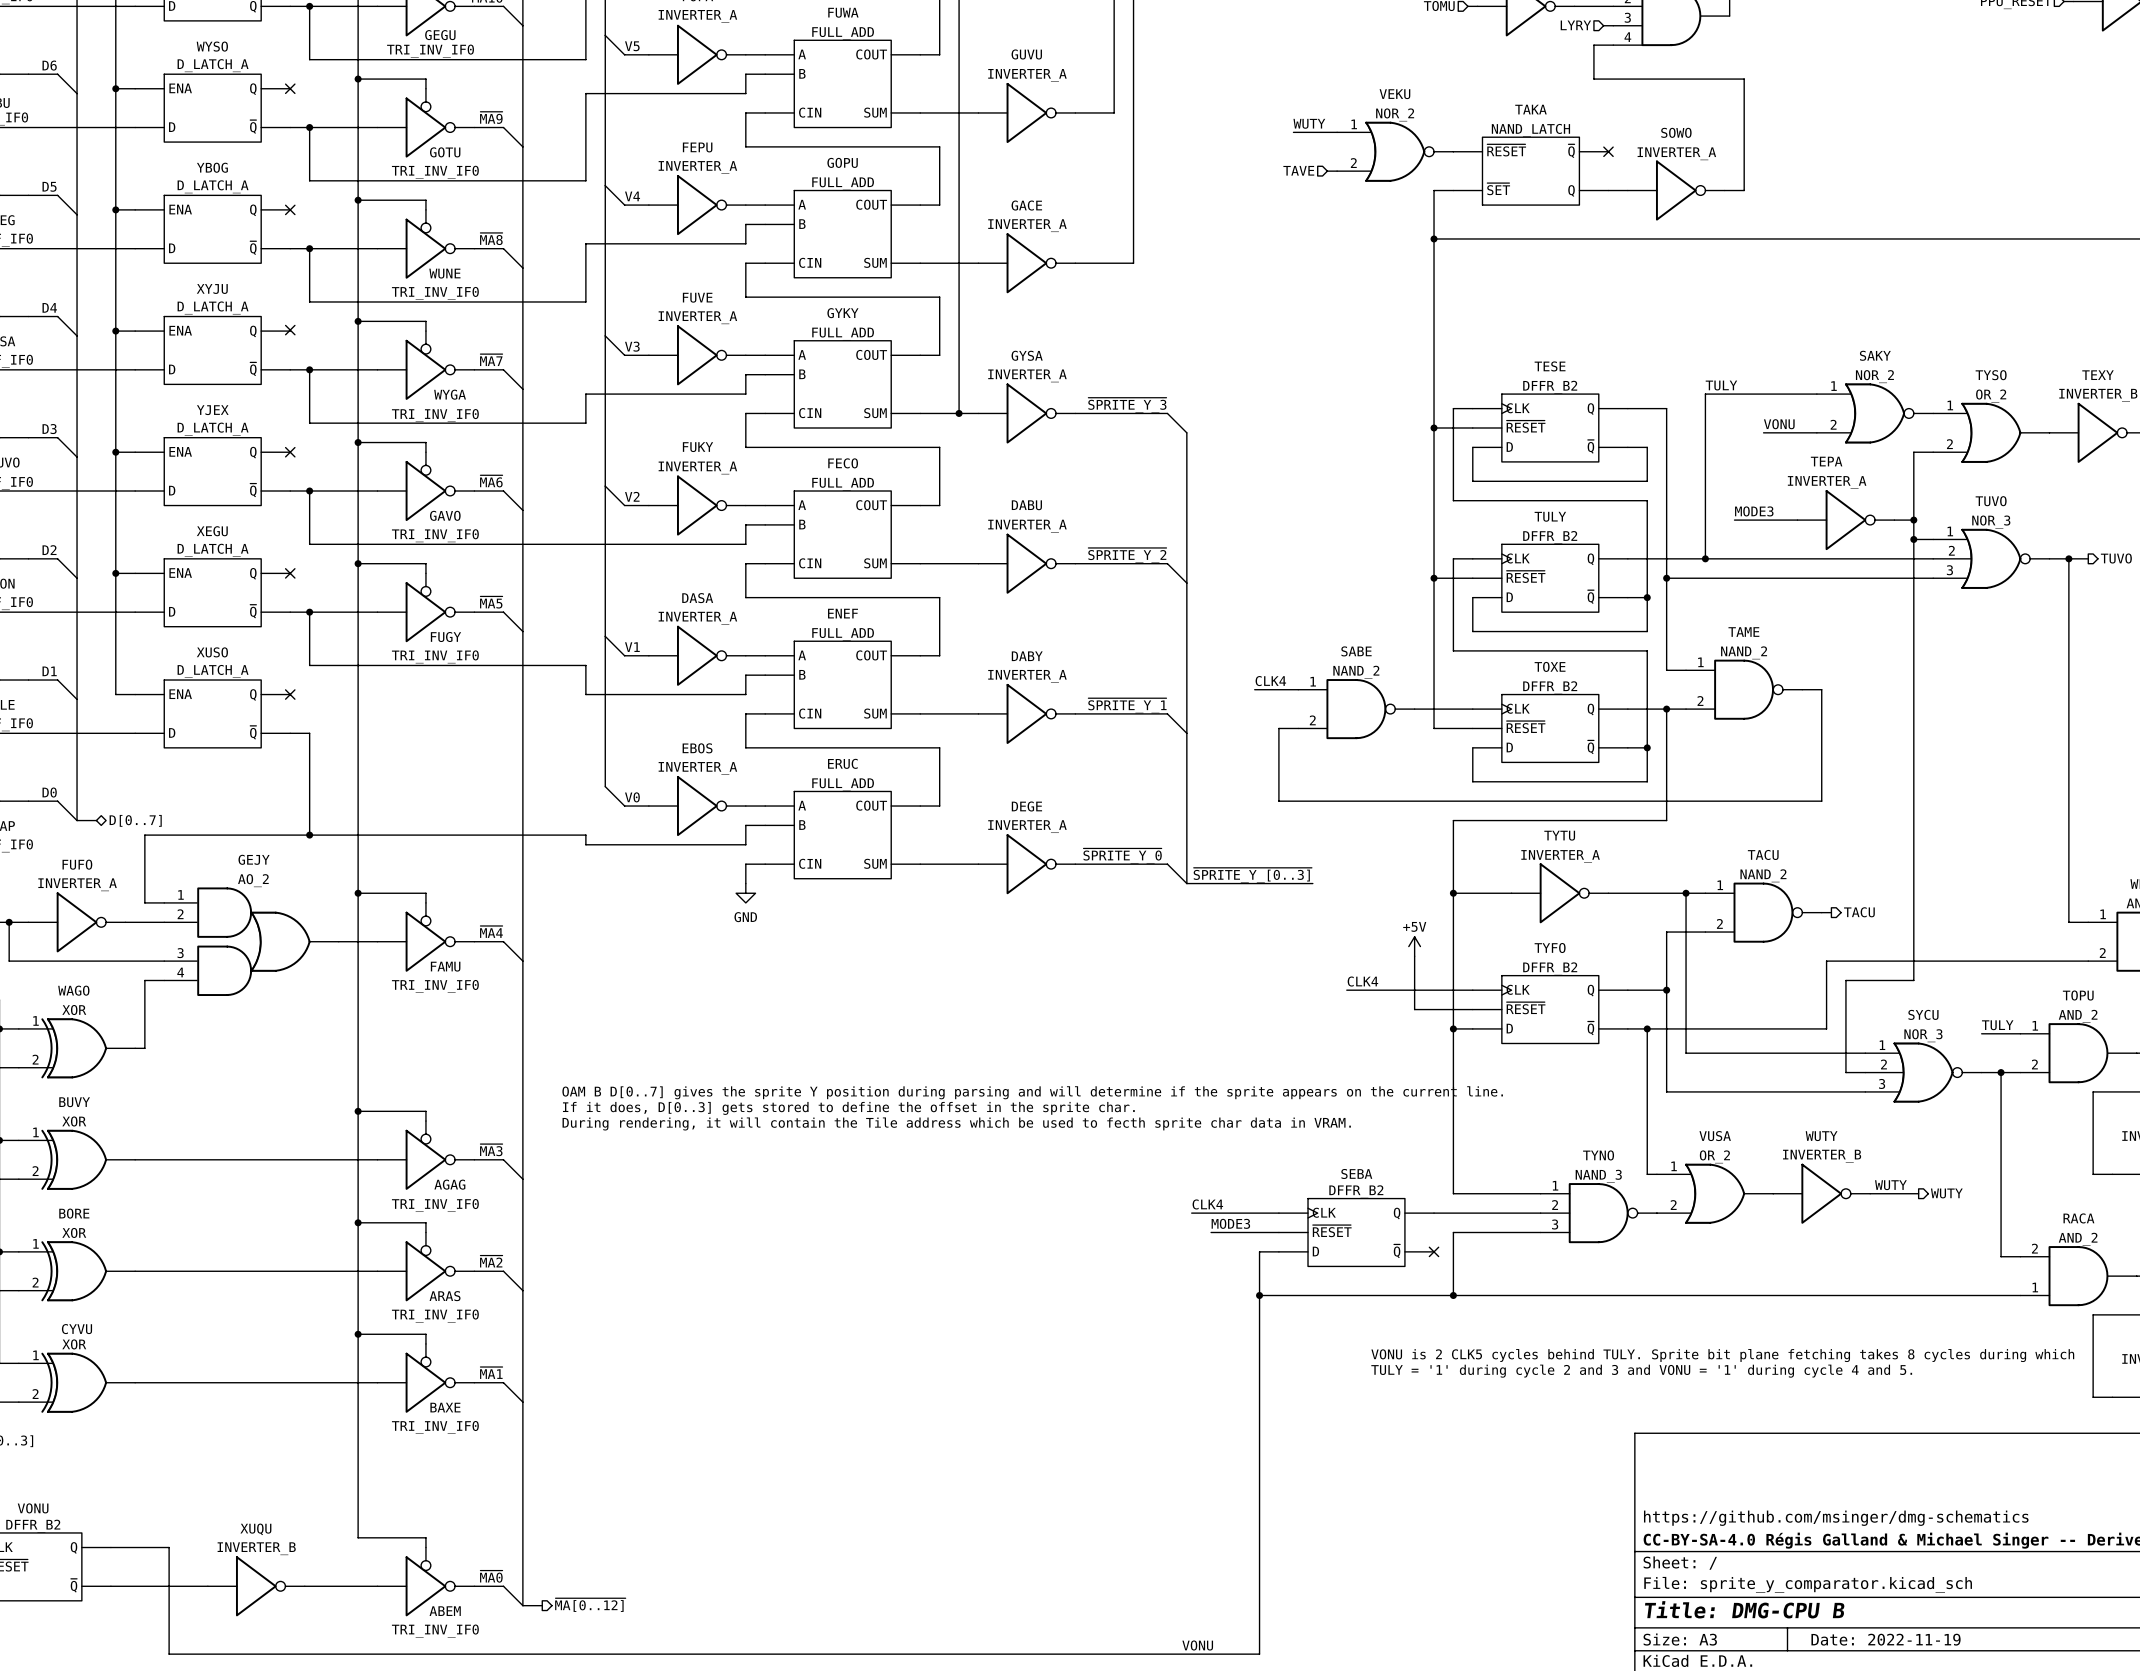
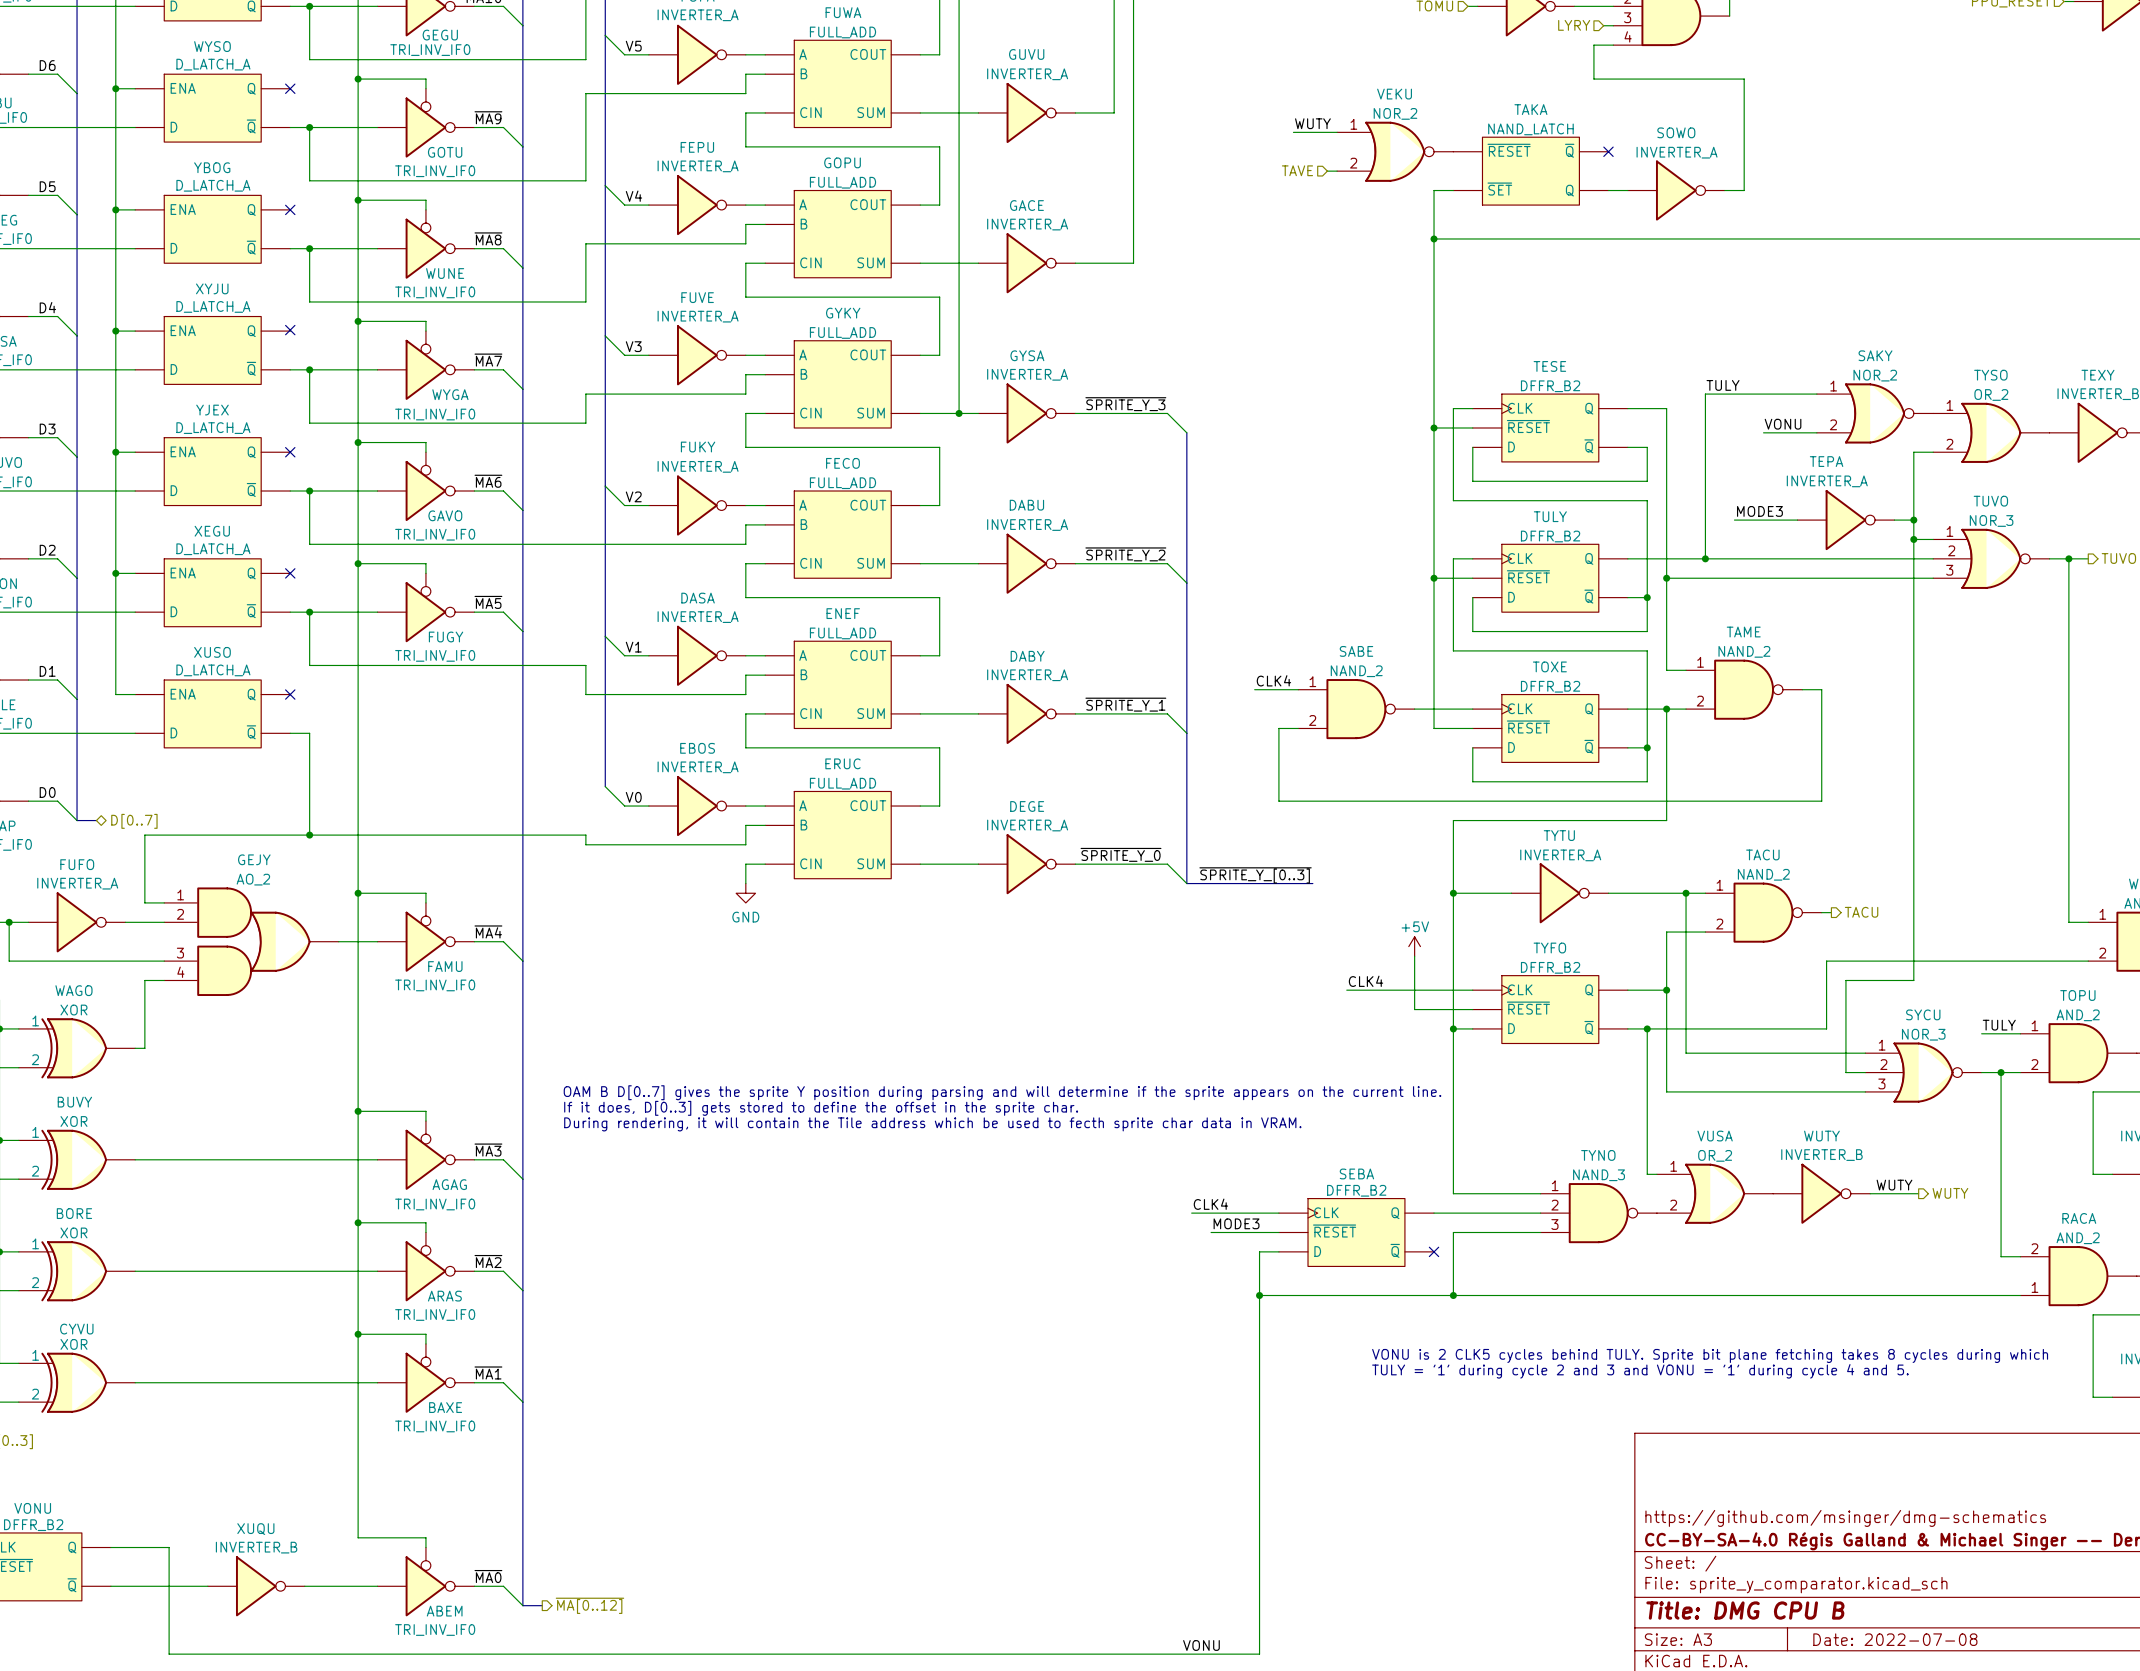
title block: Title: DMG-CPU B (1744, 1609) -> Title: DMG CPU B (1745, 1610)
title block: Date: 2022-11-19 (1886, 1639) -> Date: 2022-07-08 (1895, 1639)

